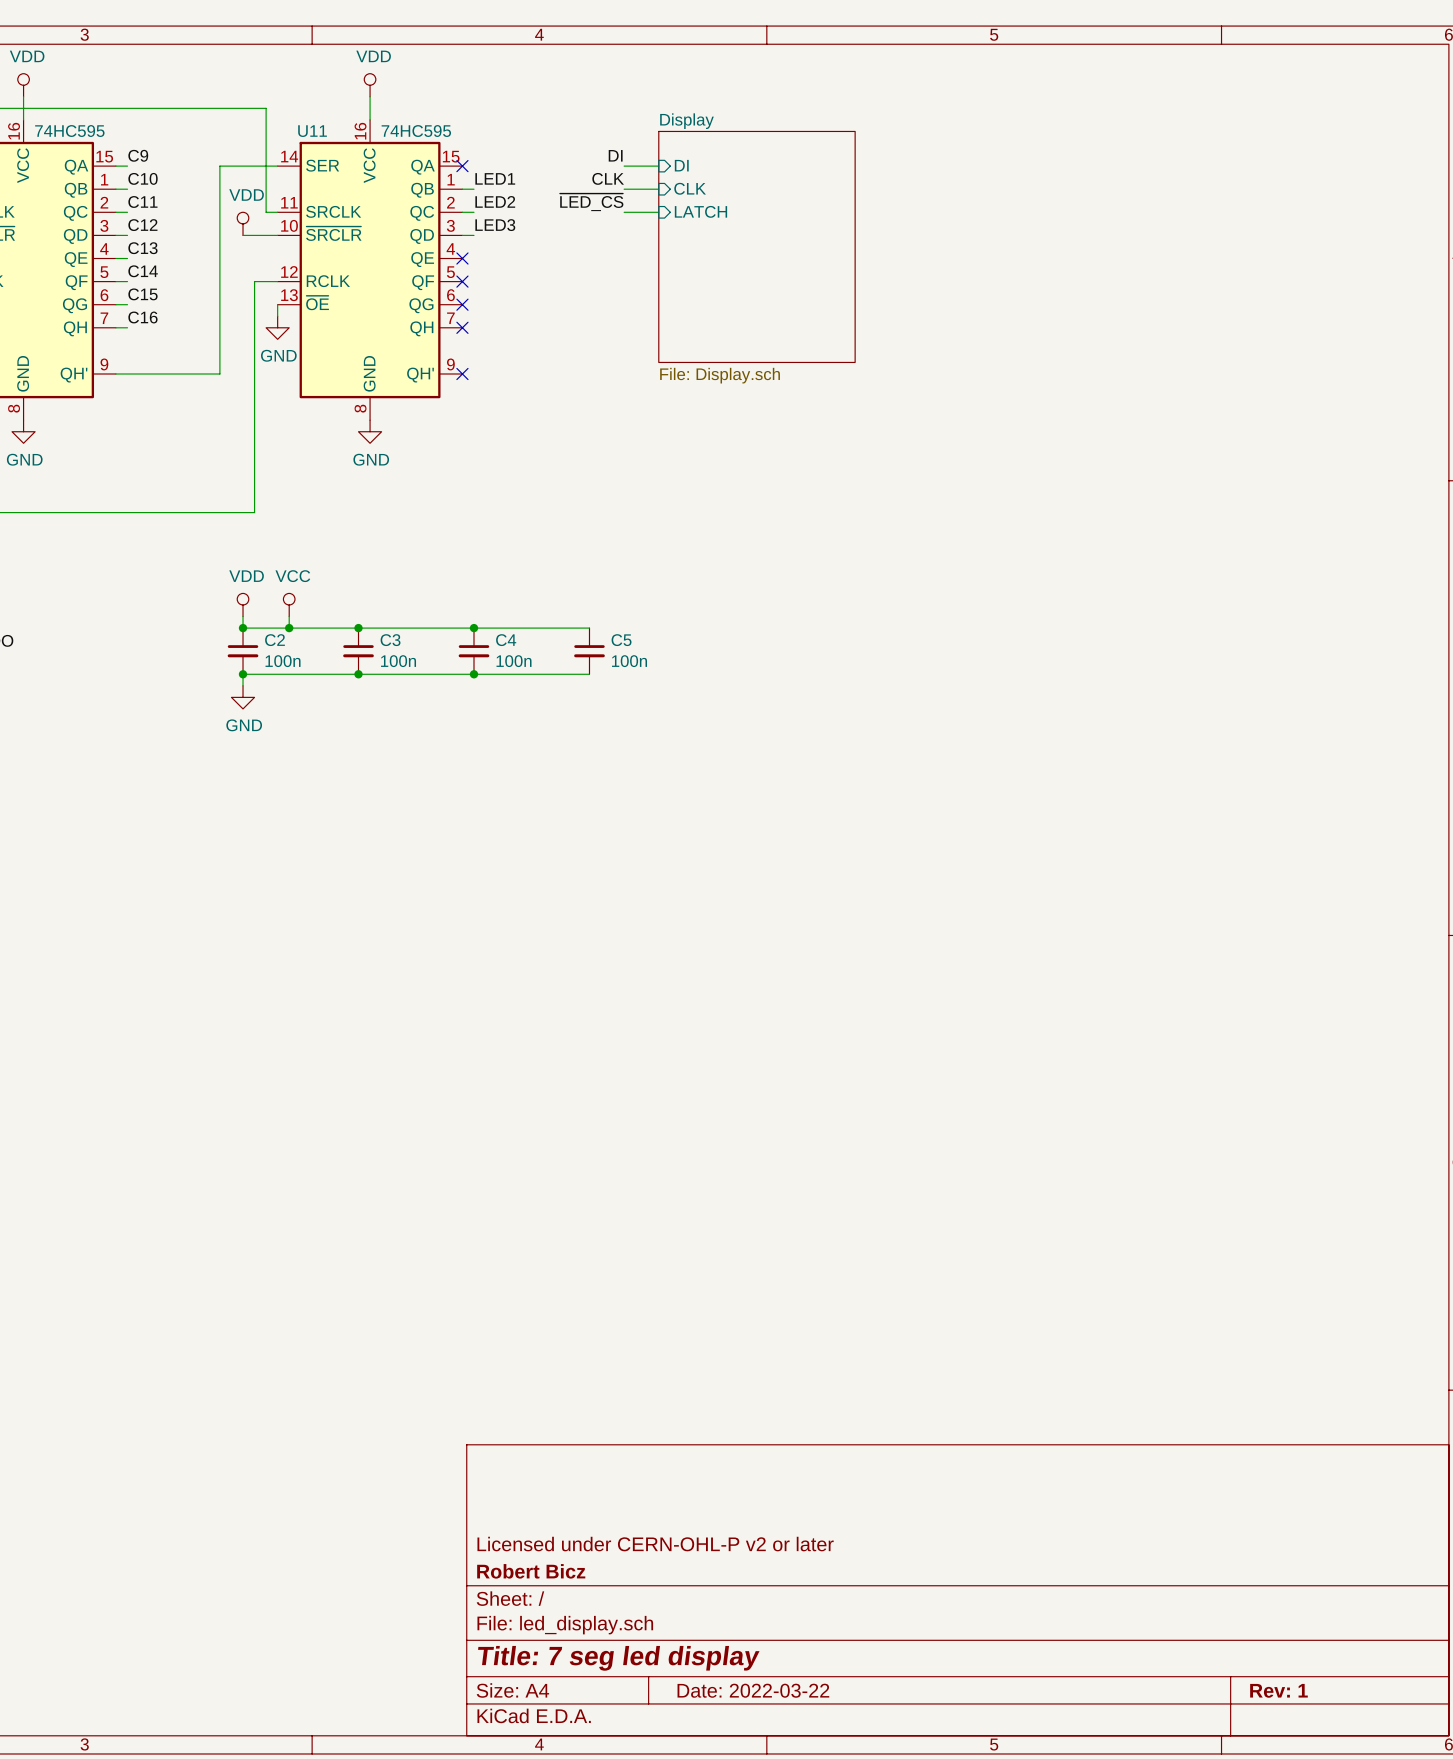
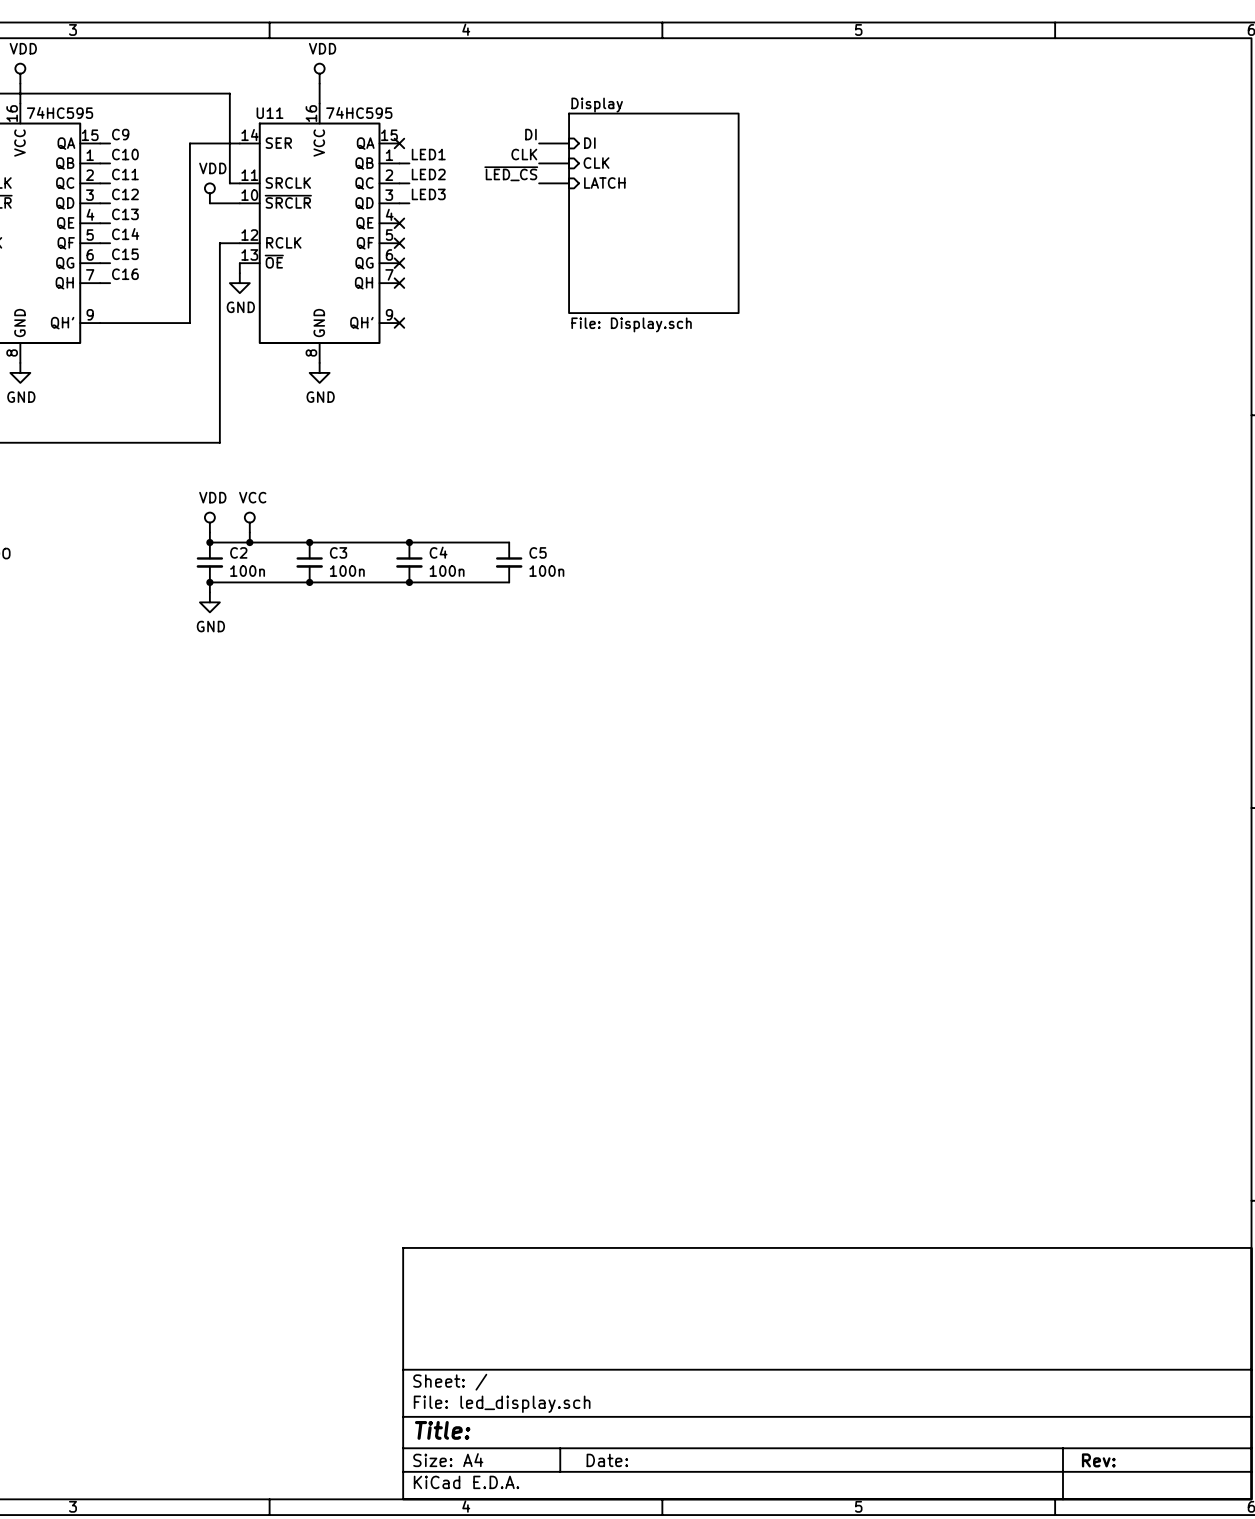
title block: Licensed under CERN-OHL-P v2 or later (655, 1544) -> none
title block: Robert Bicz (531, 1571) -> none
title block: Title: 7 seg led display (618, 1658) -> Title: (442, 1430)
title block: Date: 2022-03-22 (753, 1690) -> Date: (607, 1460)
title block: Rev: 1 (1278, 1690) -> Rev: (1098, 1460)

